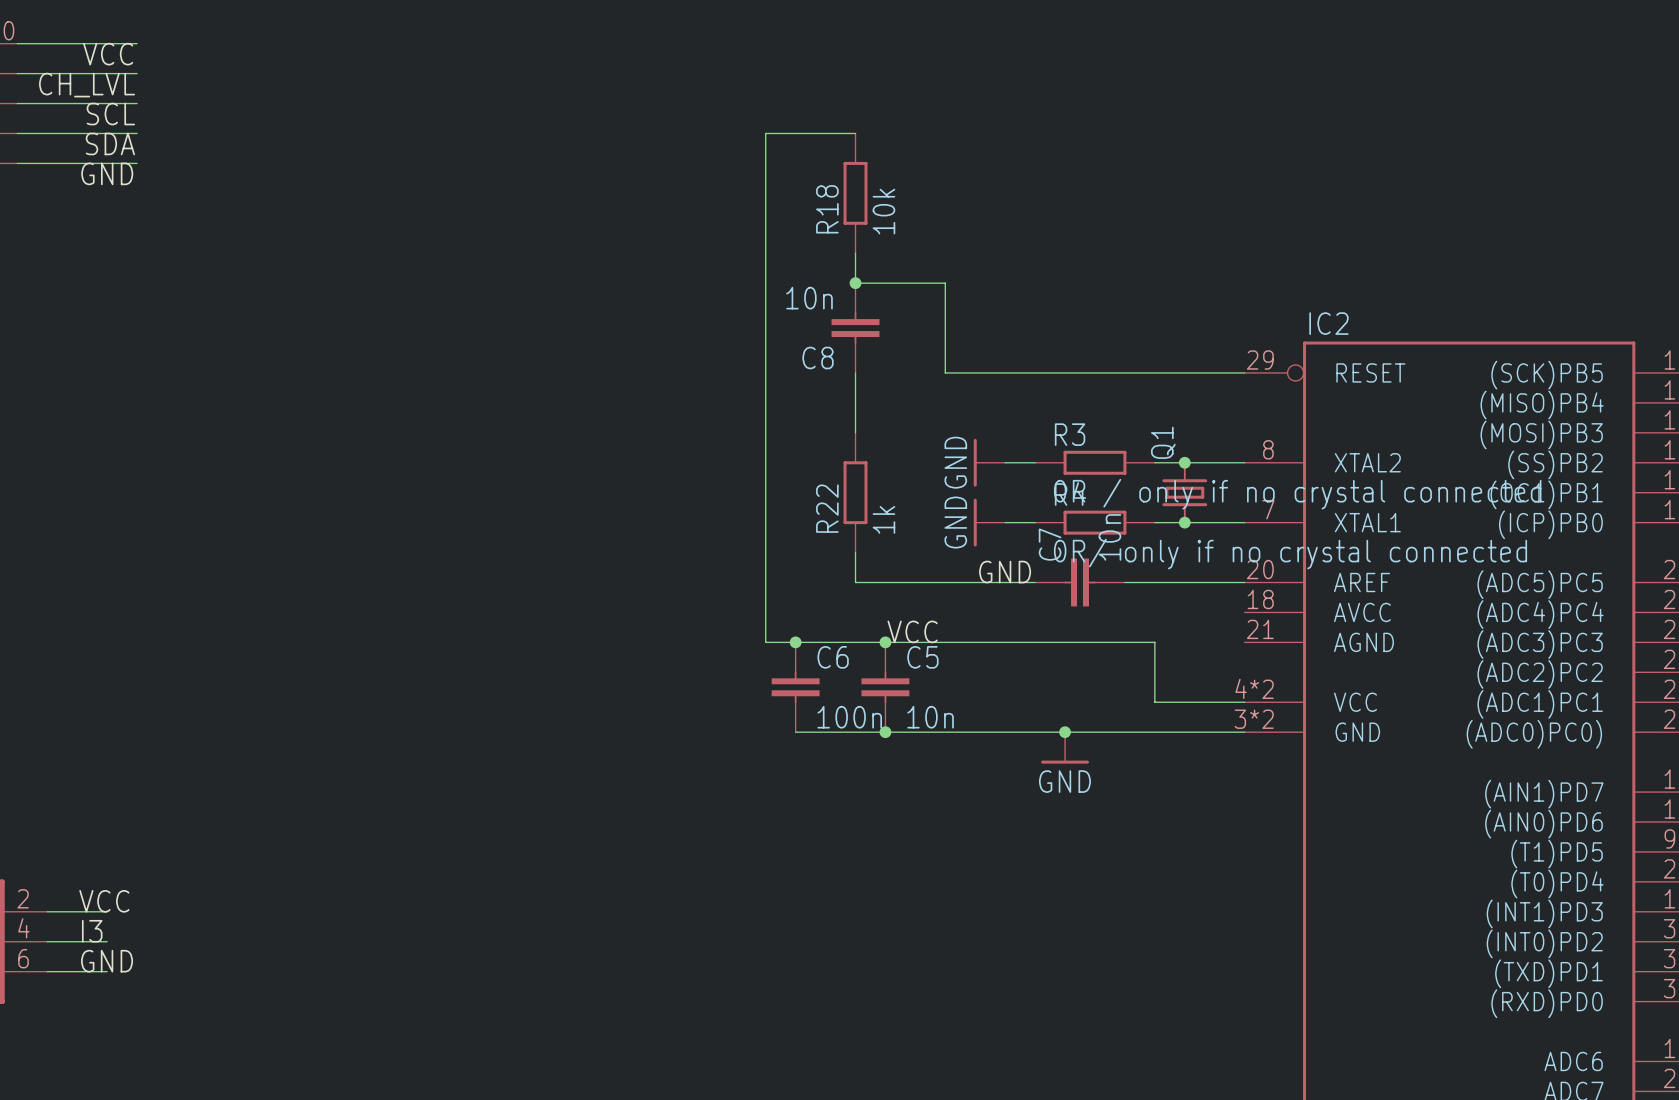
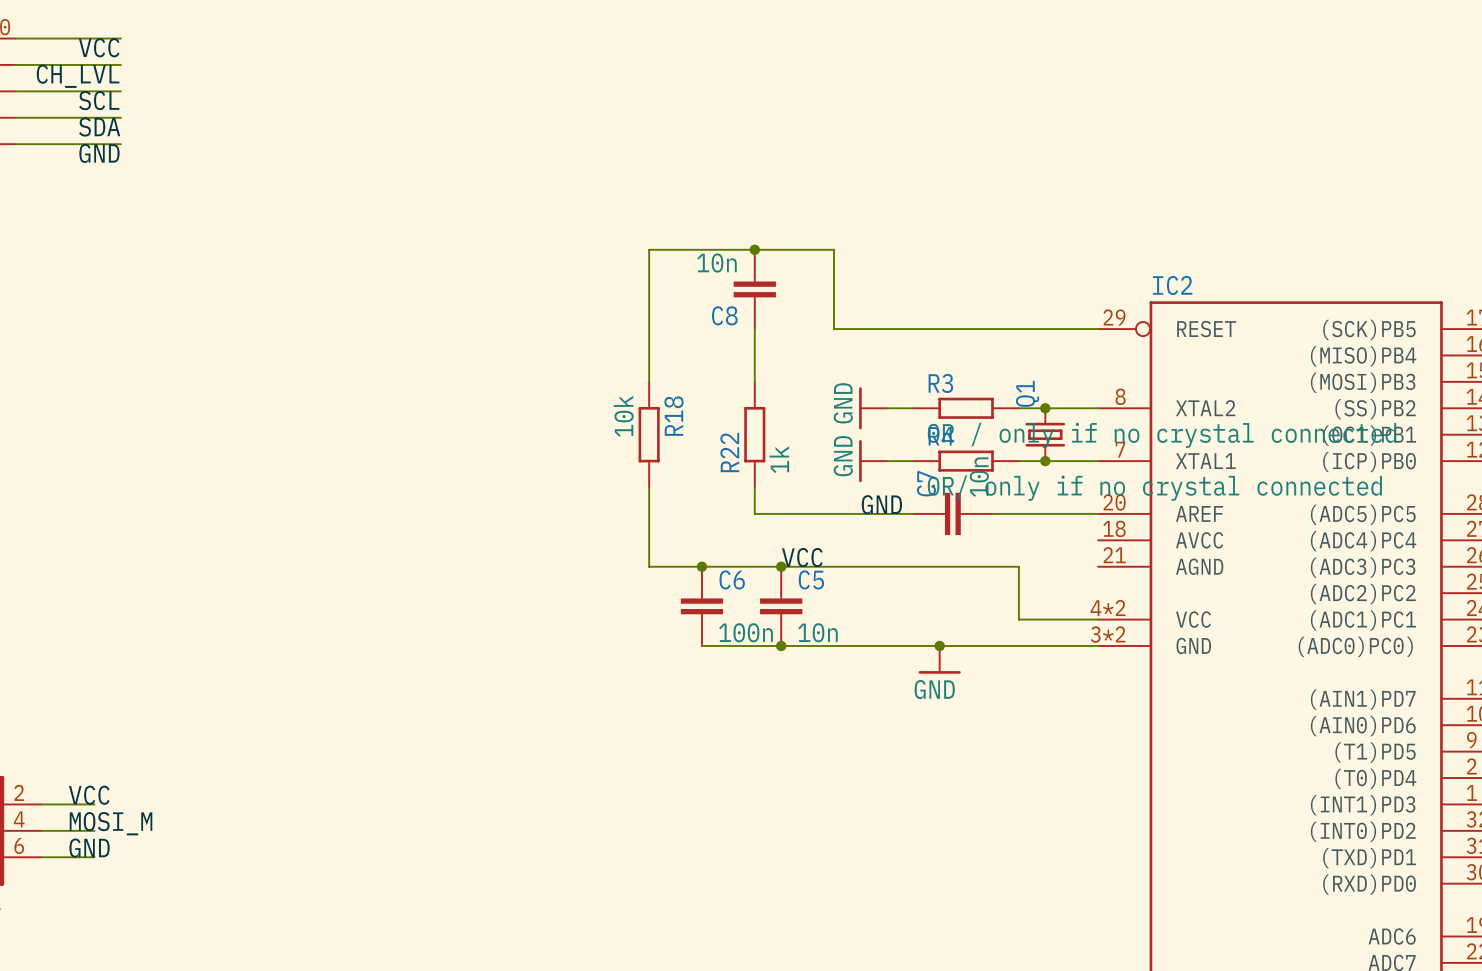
wire: (855, 133) (765, 133) (765, 642) -> (649, 487) (649, 566) (675, 566)
R18 position: (855, 193) -> (649, 434)
R18 name position: R18 (827, 209) -> R18 (673, 416)
R18 value position: 10k (883, 211) -> 10k (623, 416)
wire: (855, 253) (855, 283) -> (649, 381) (649, 249) (754, 249)
label: I3 (92, 931) -> MOSI_M (111, 823)

